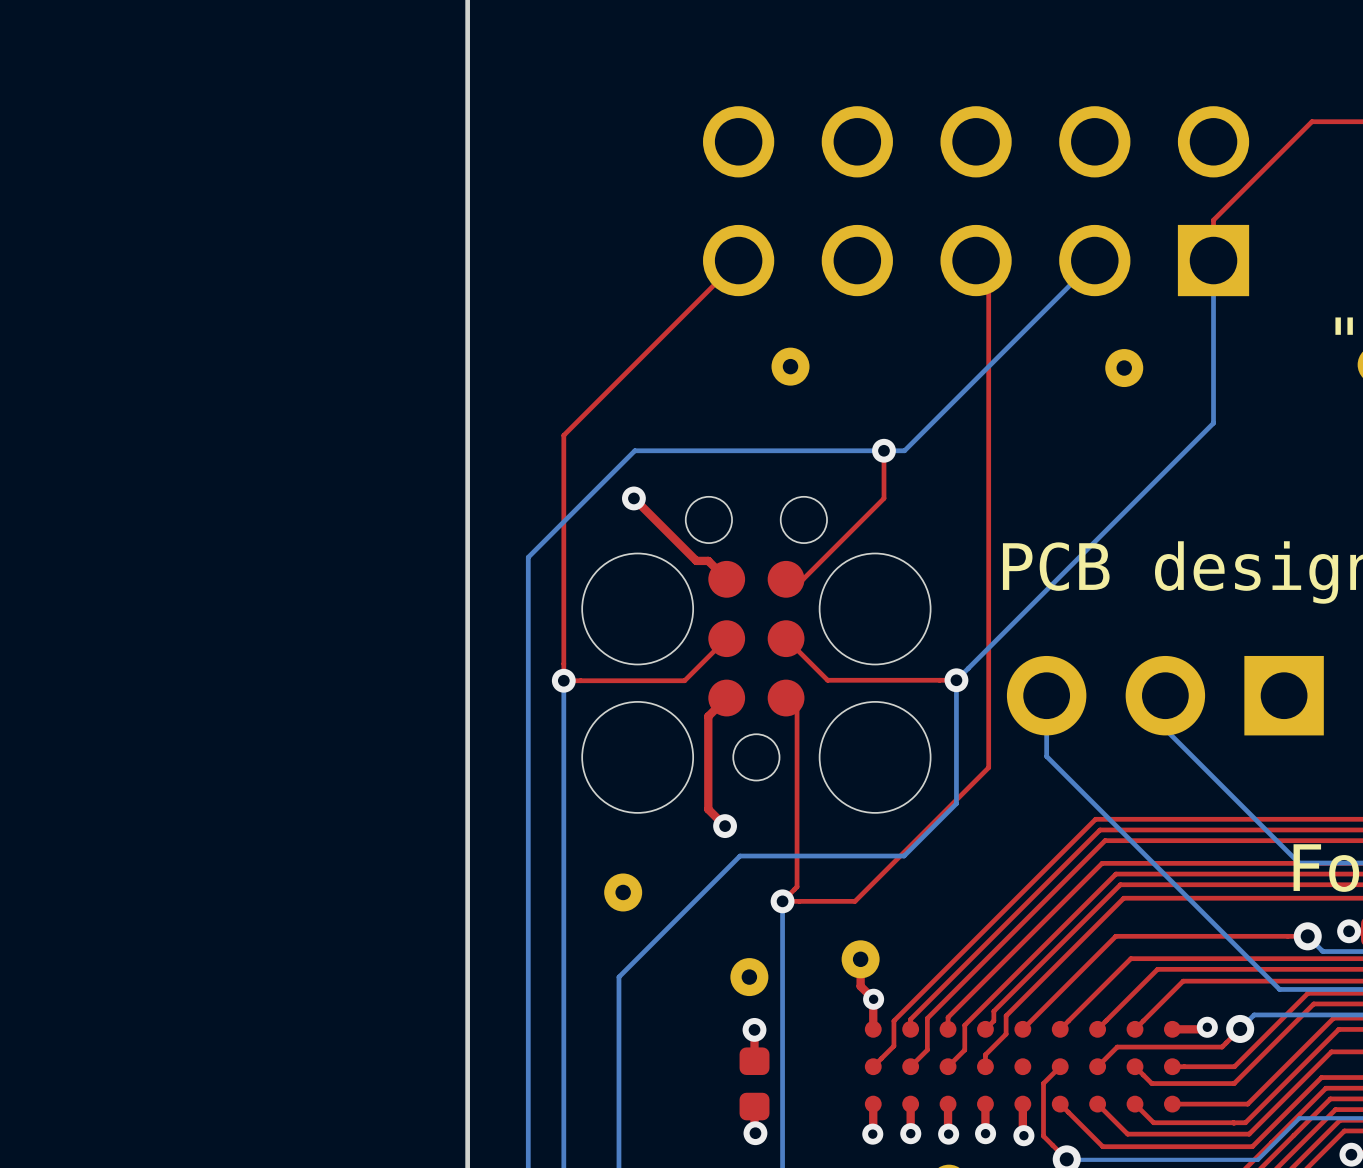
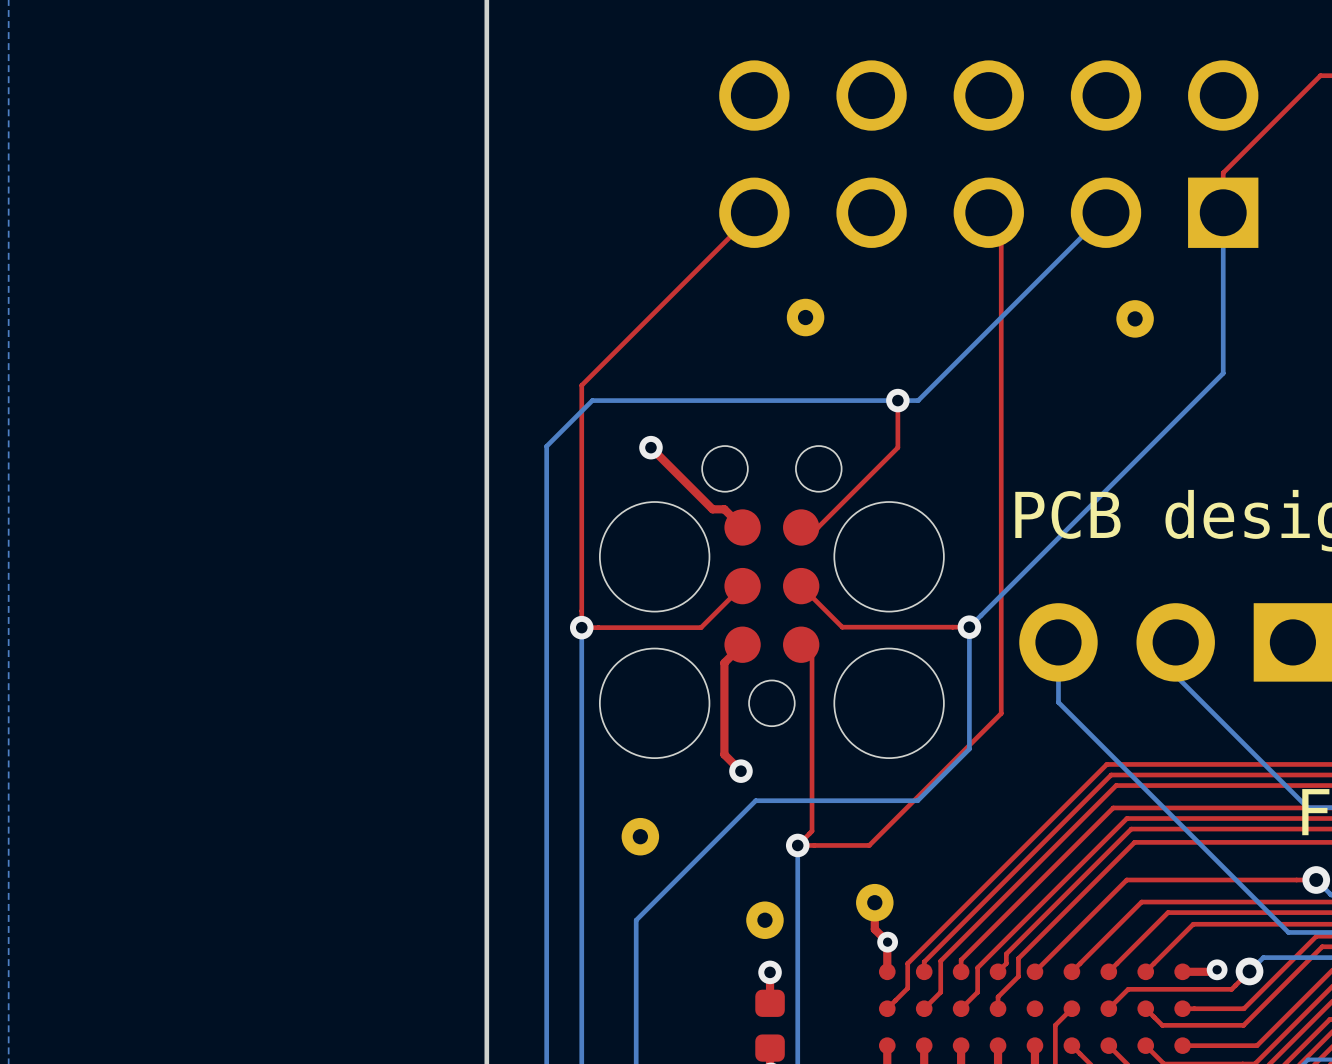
bottom track: (634, 450) (528, 557) -> (651, 400) (592, 400) (546, 446) (546, 505)

